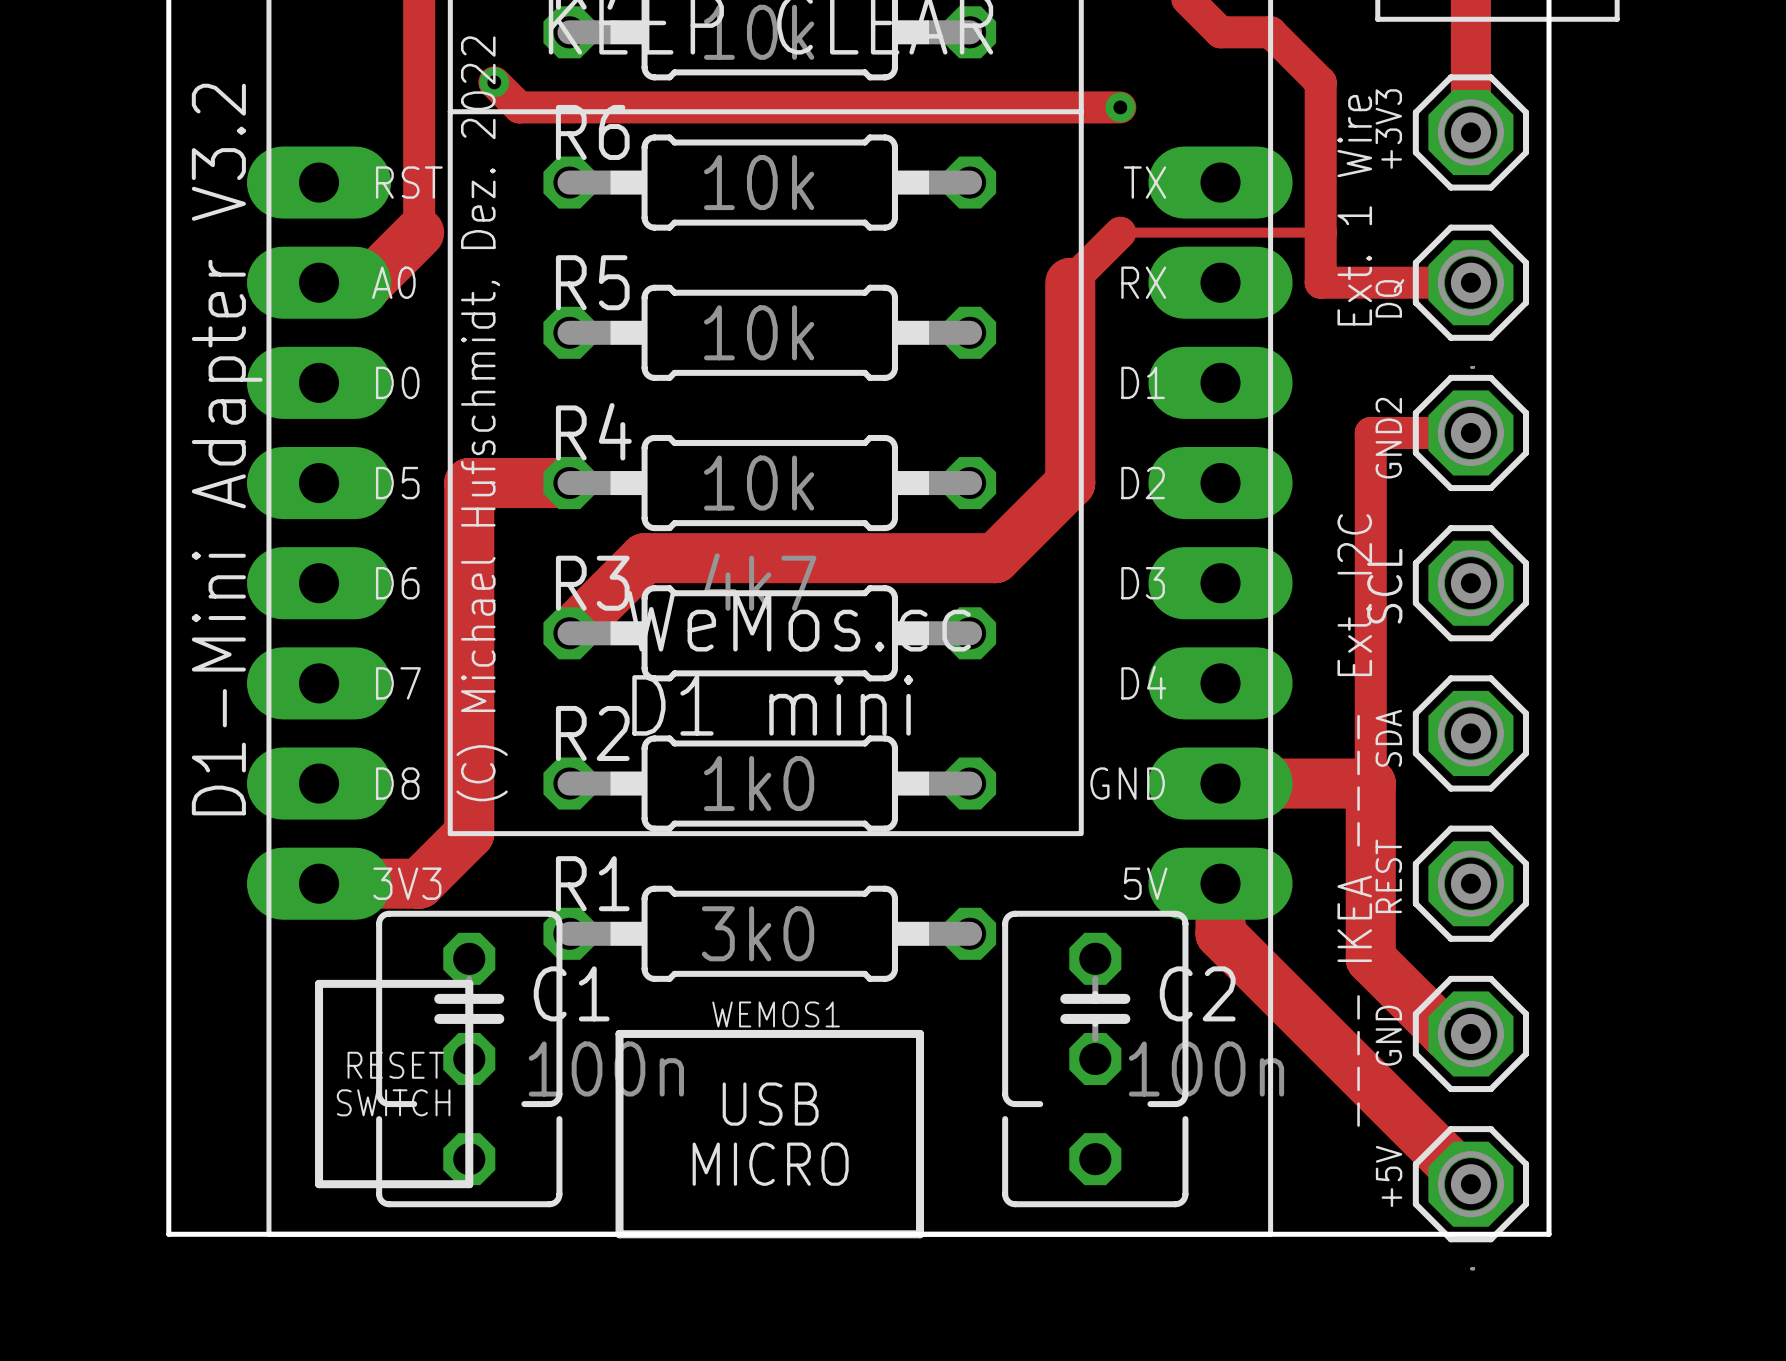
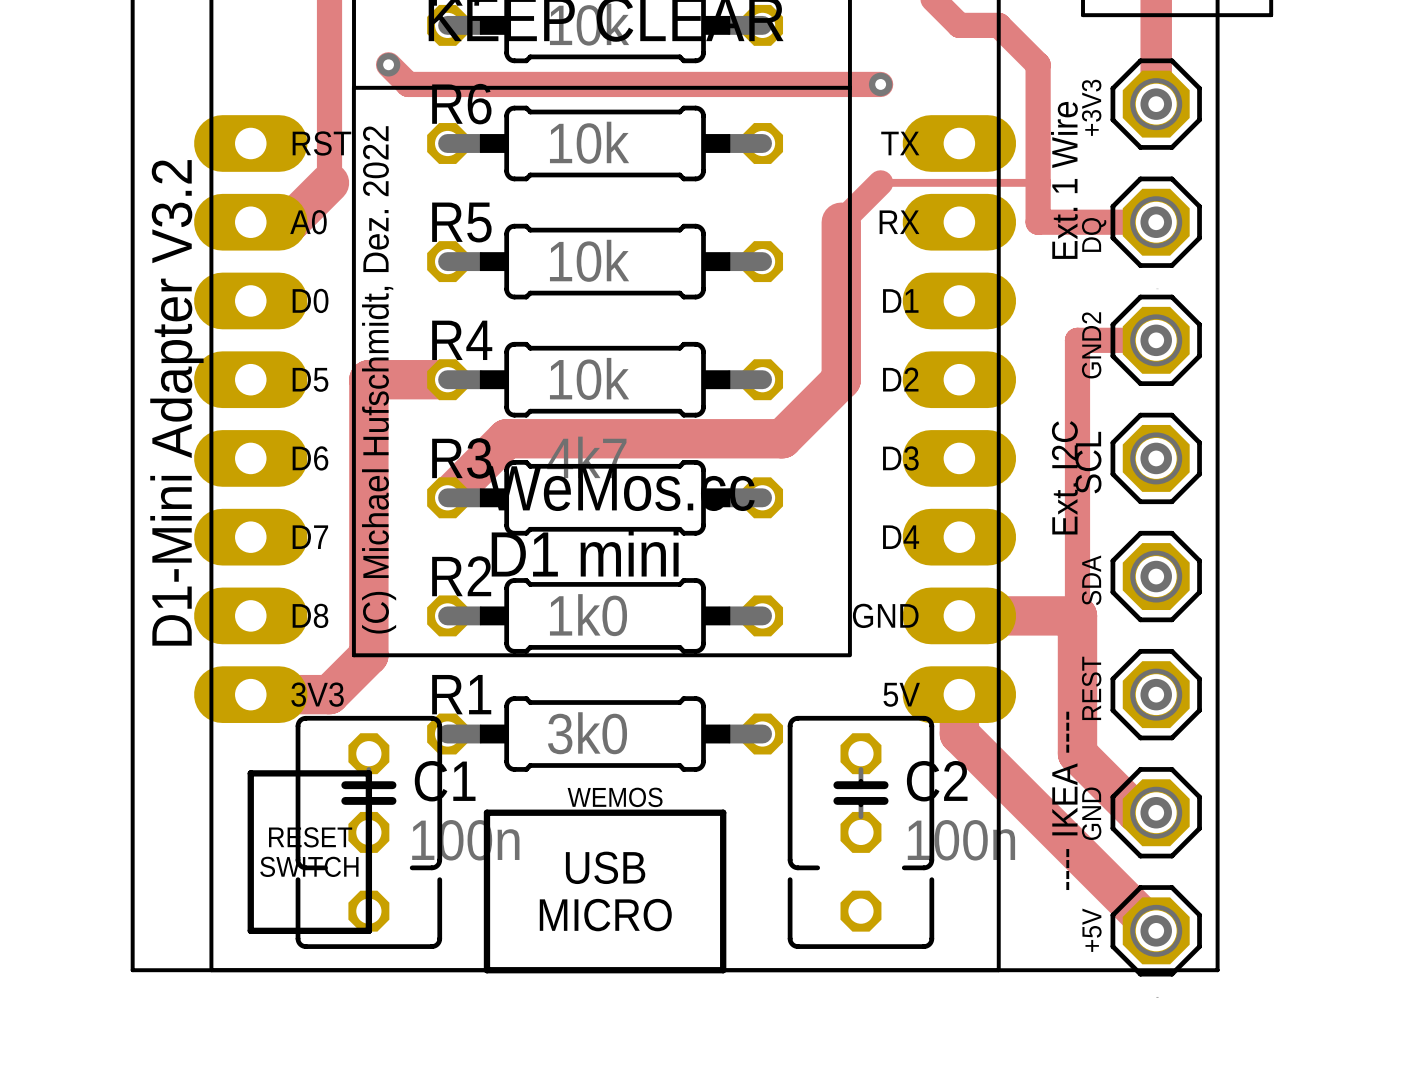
WEMOS1 name: WEMOS1 (776, 1014) -> WEMOS (615, 797)

